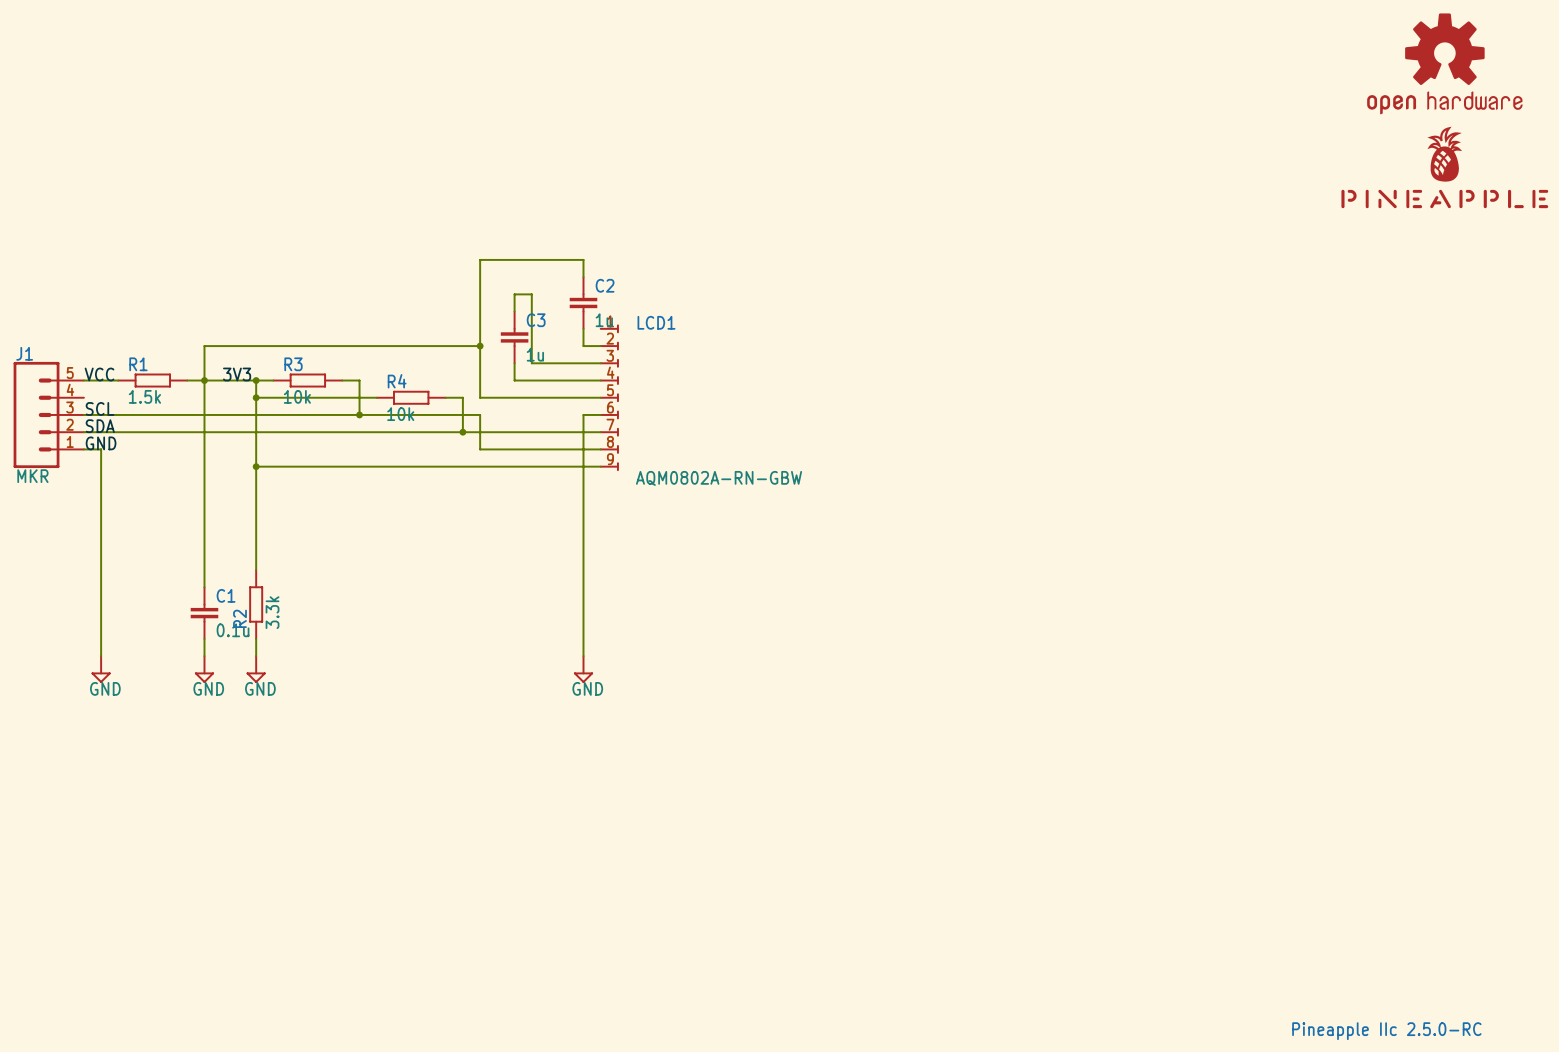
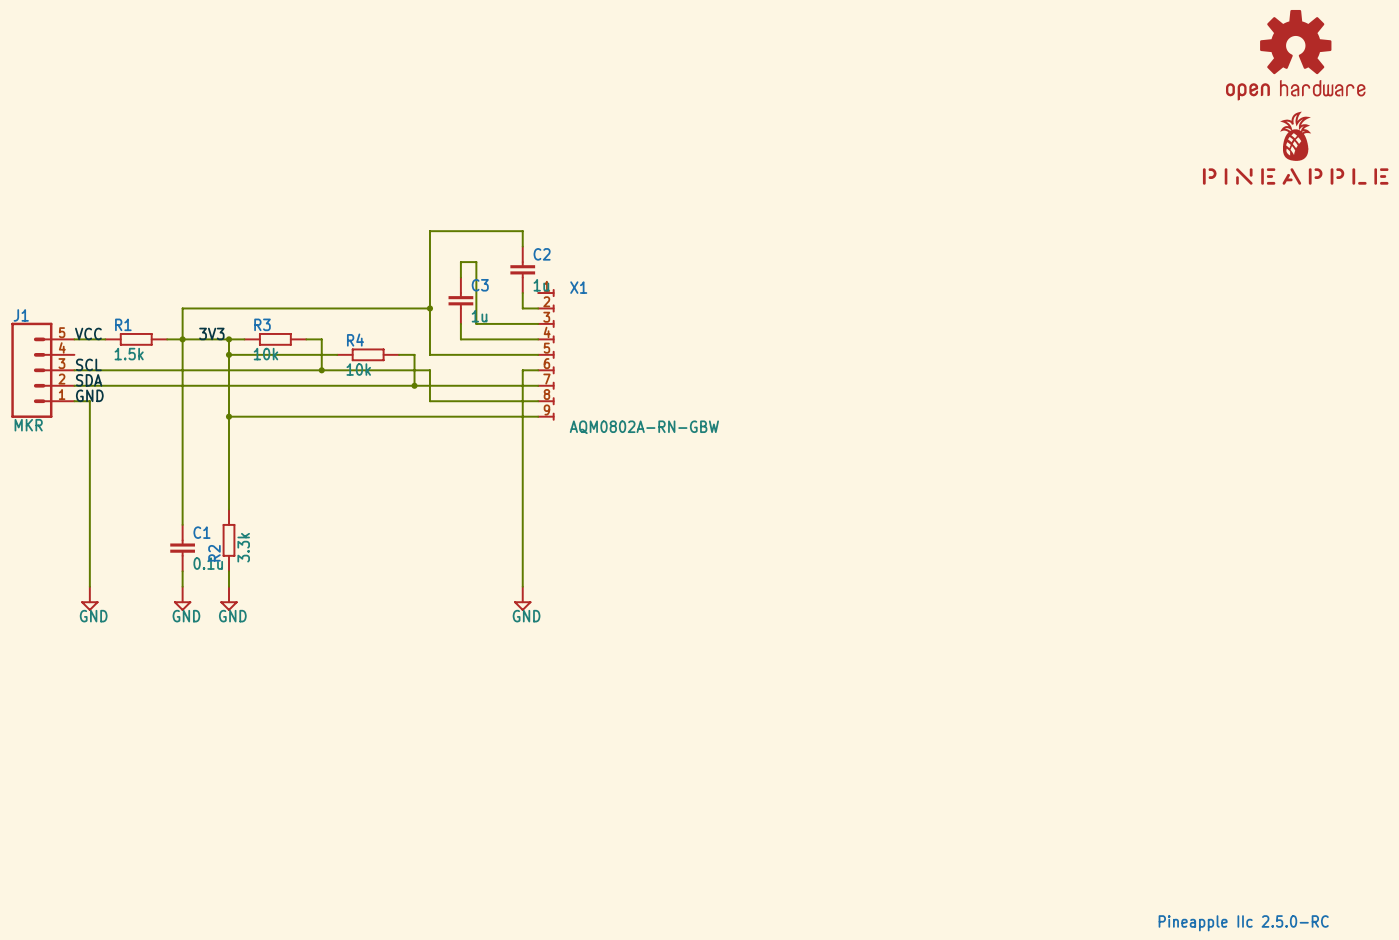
LCD1 name: LCD1 (656, 322) -> X1 (578, 287)

